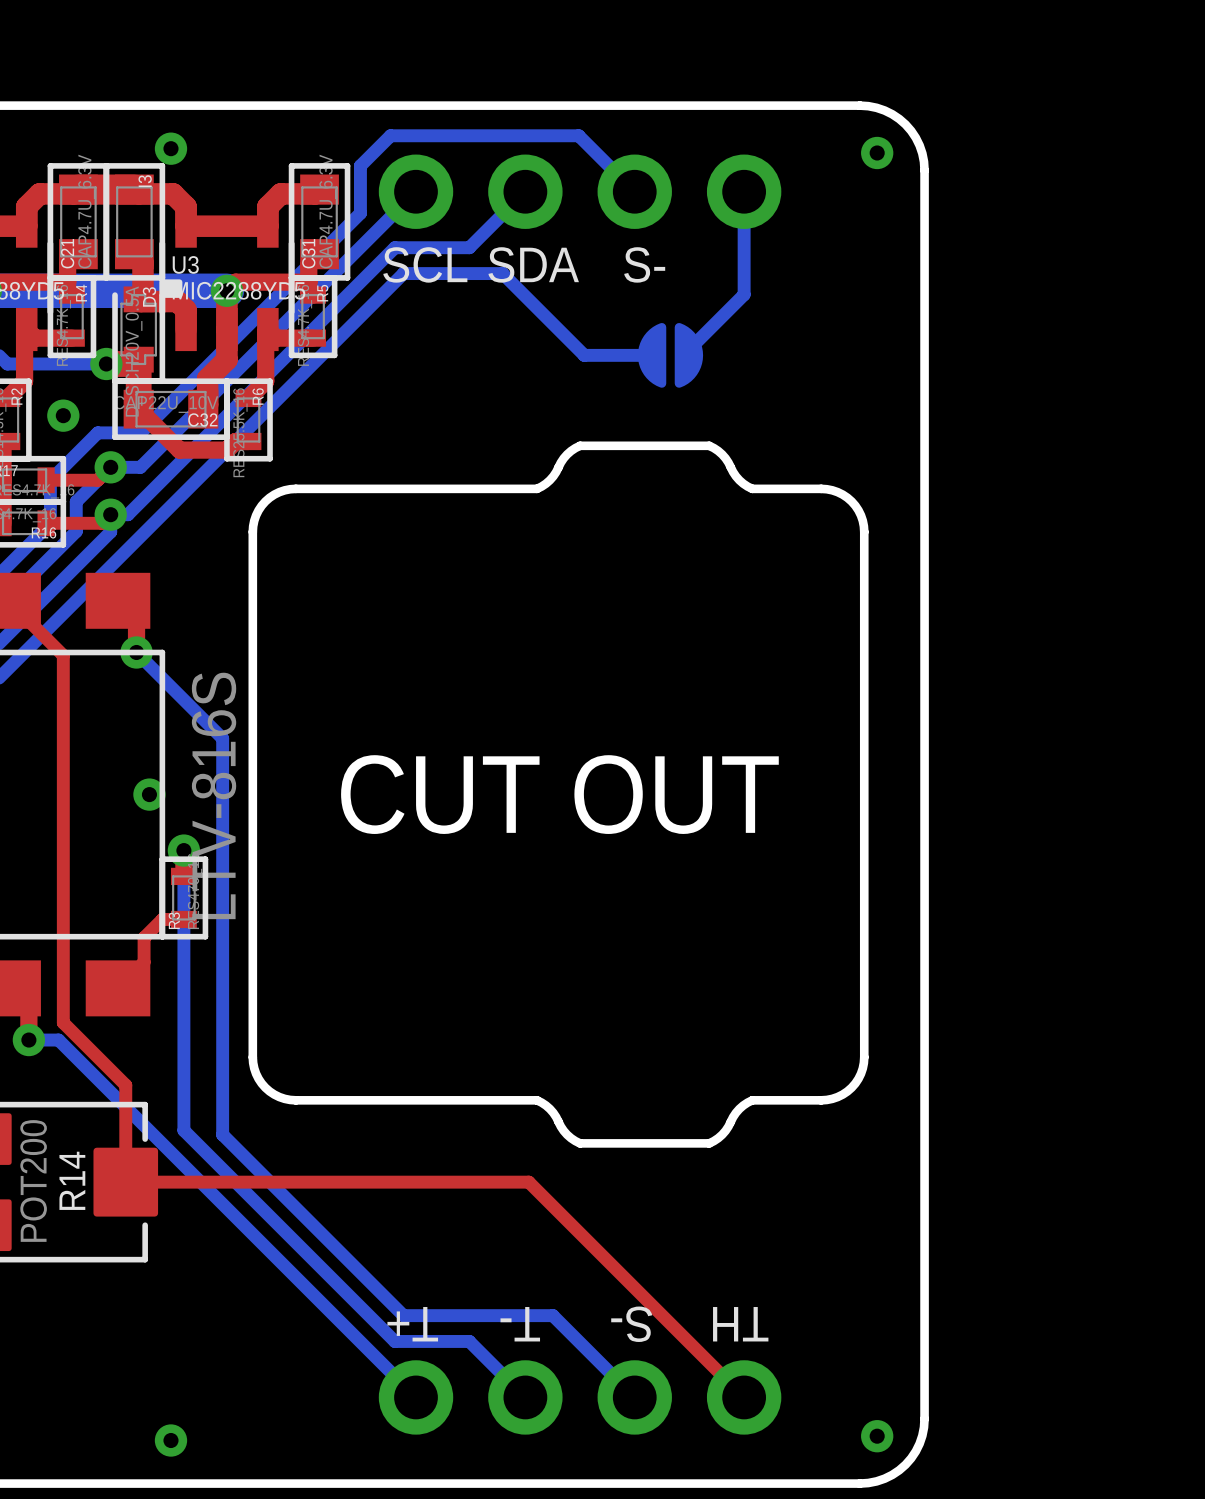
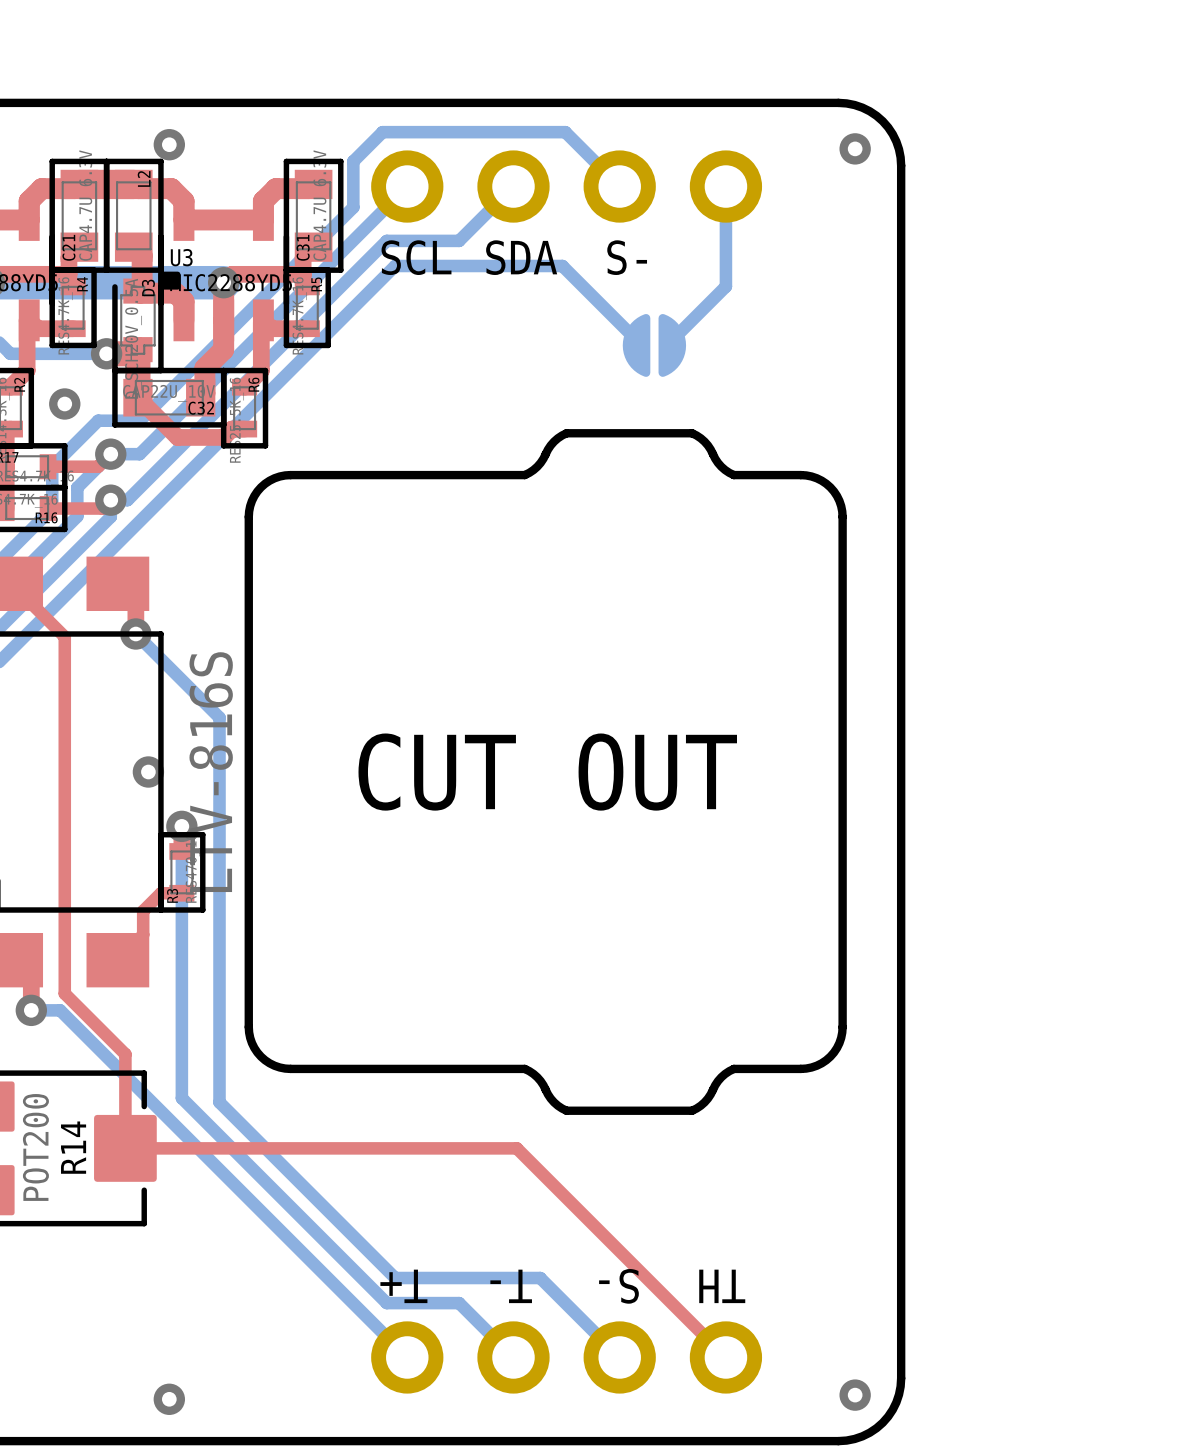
I3 name: I3 (145, 181) -> L2 (144, 178)
bottom track: (502, 273) (584, 355) (657, 355) -> (491, 265) (562, 265) (641, 345)

